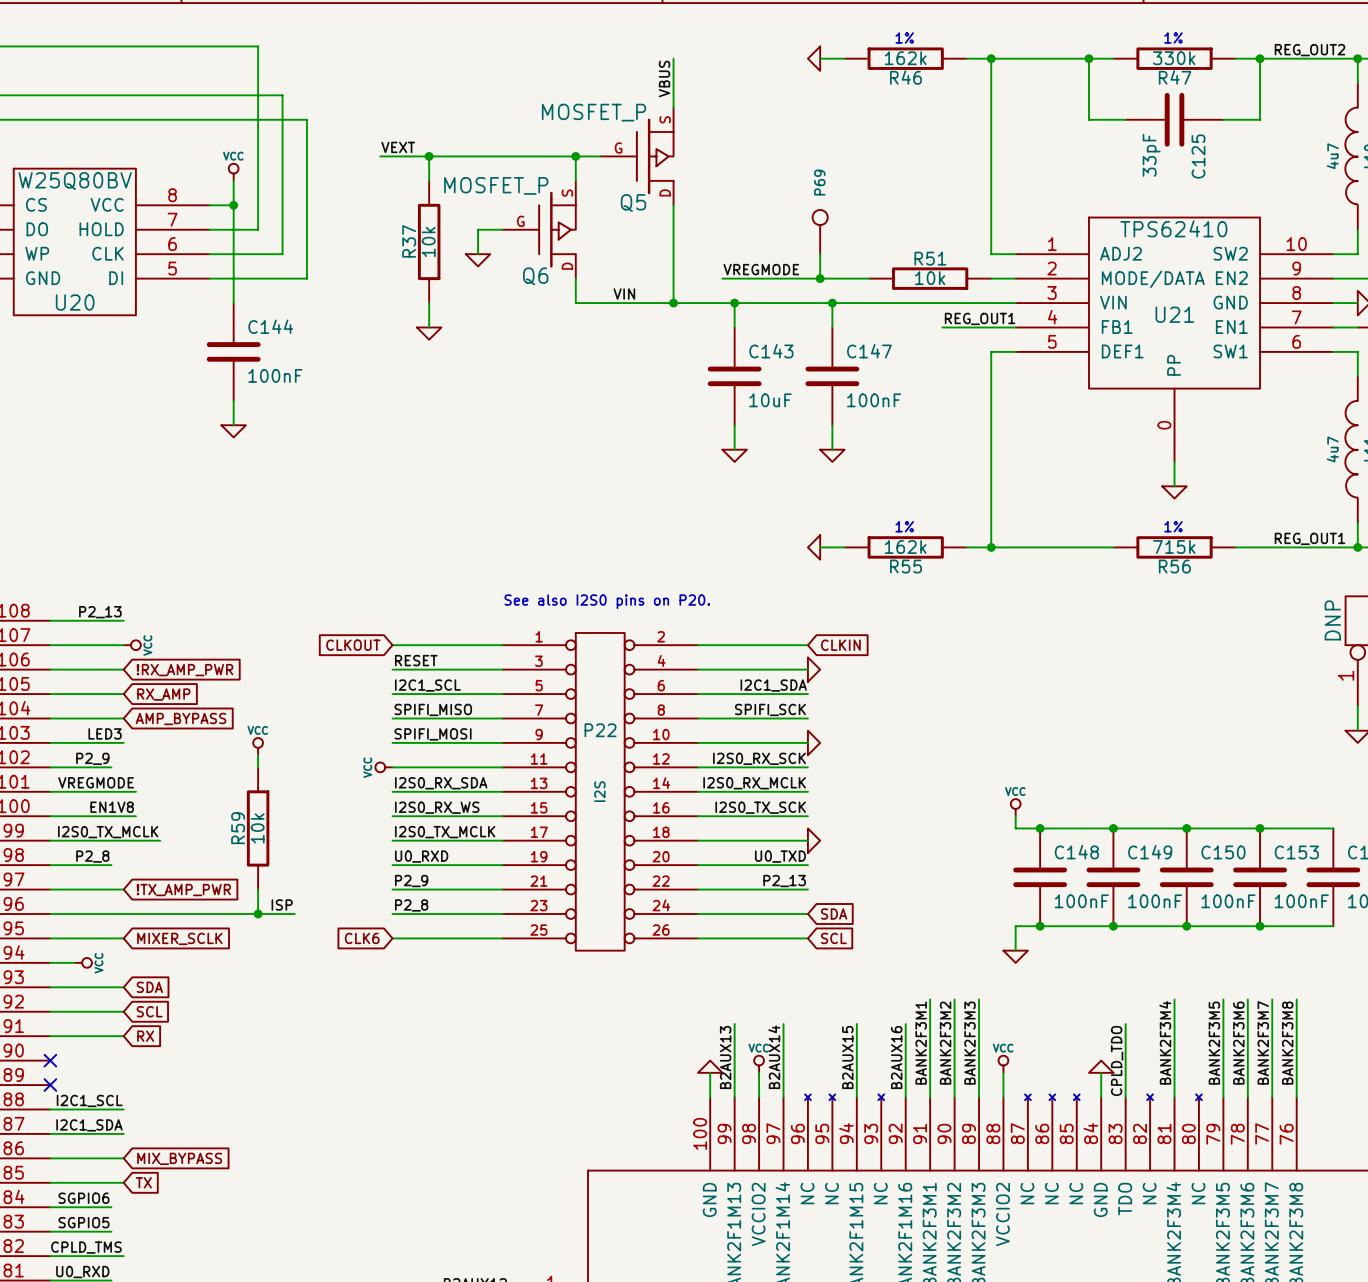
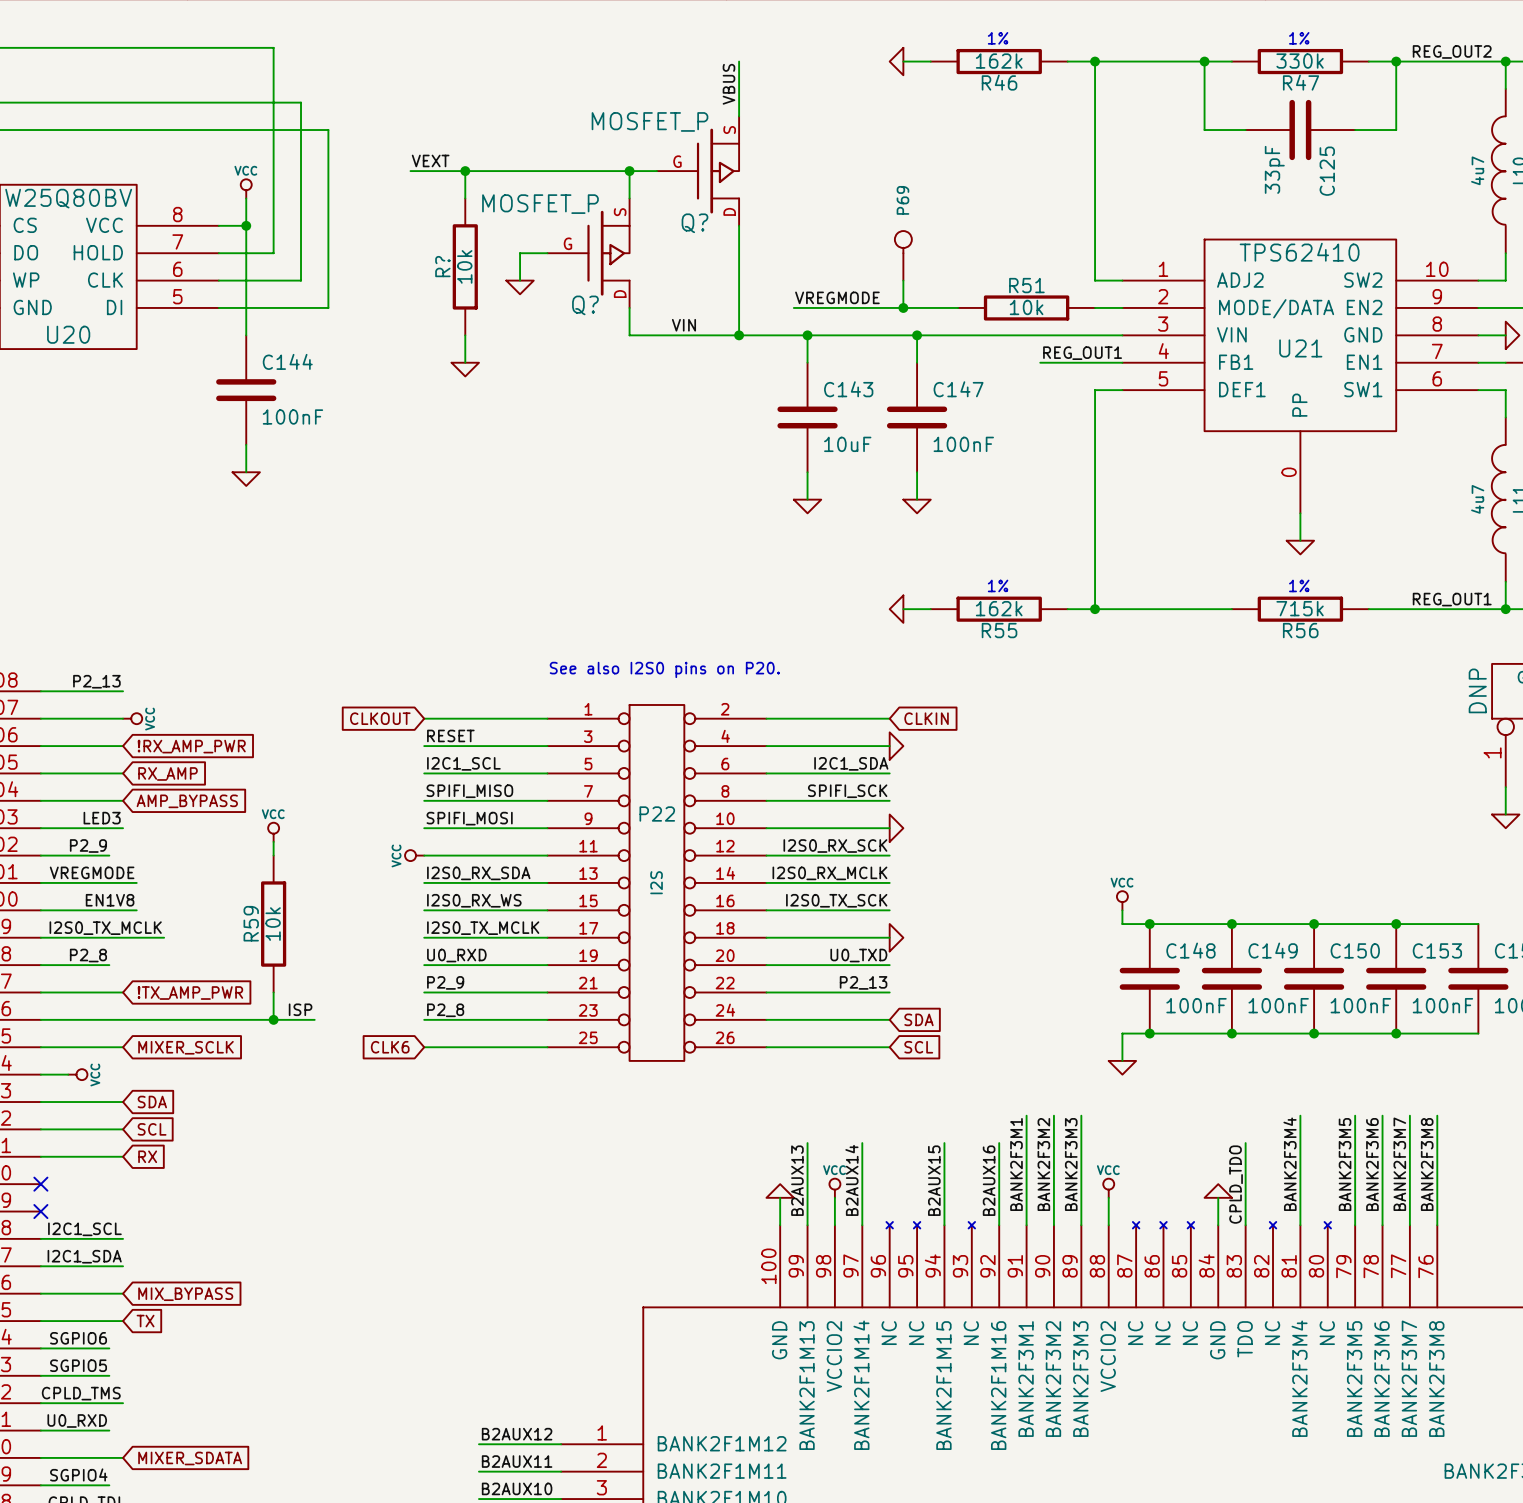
Q5 name: Q5 (633, 203) -> Q? (694, 223)
R37 name: R37 (409, 241) -> R? (442, 266)
Q6 name: Q6 (535, 276) -> Q? (585, 305)

